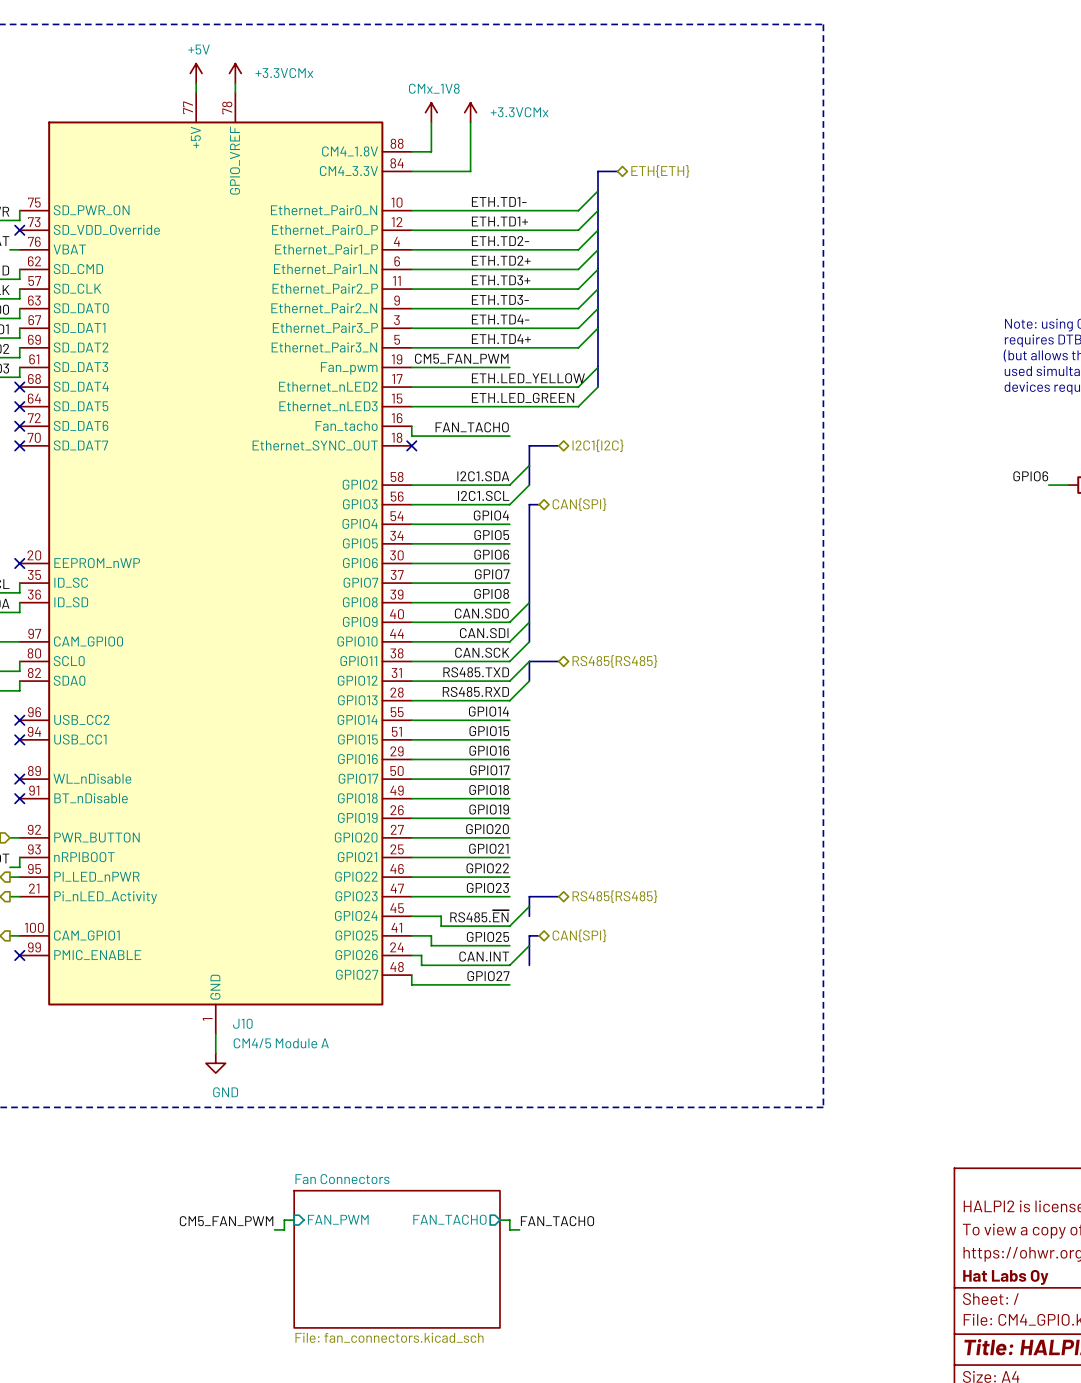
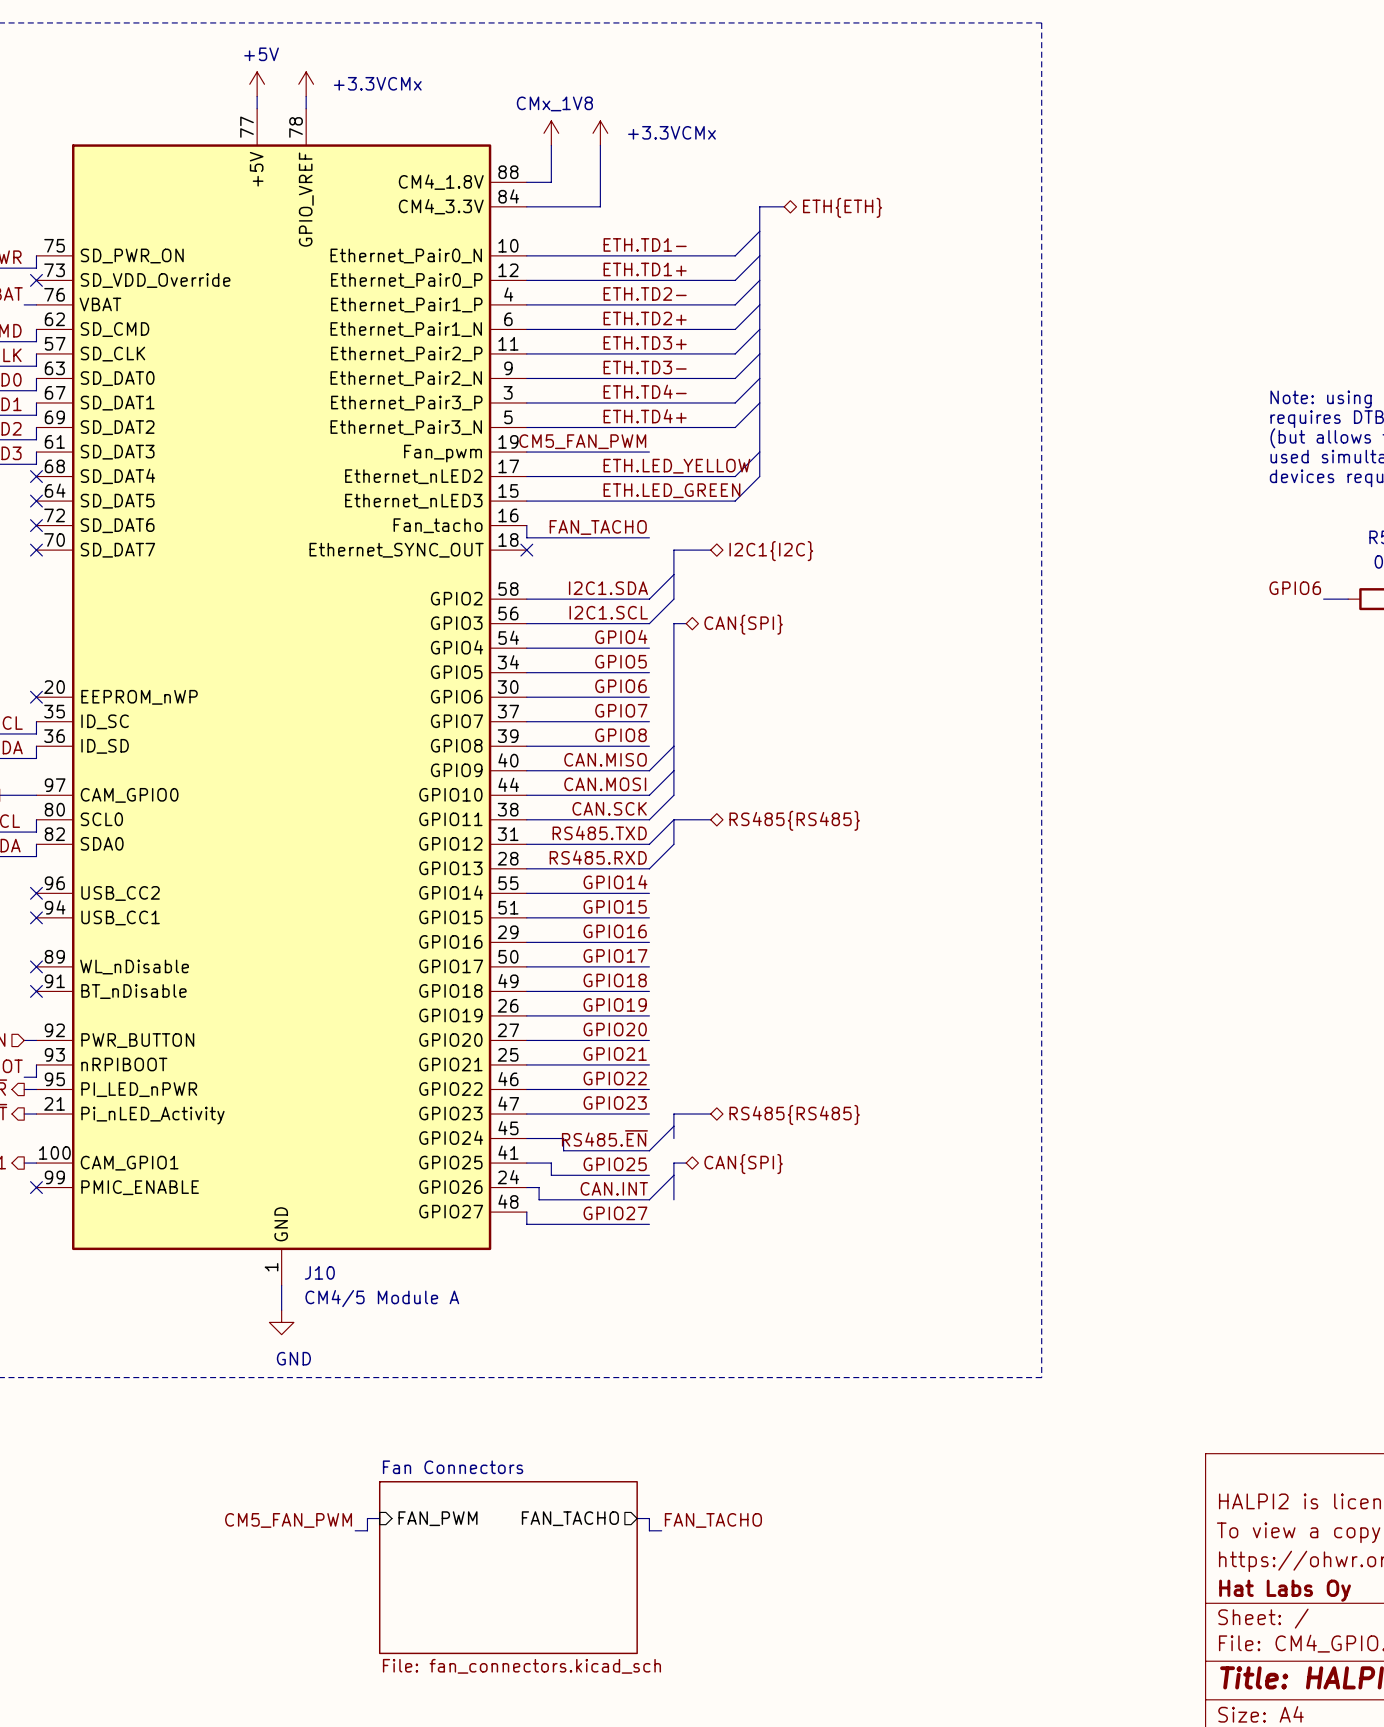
label: CAN.SDO (481, 613) -> CAN.MISO (605, 759)
label: CAN.SDI (484, 633) -> CAN.MOSI (605, 784)

